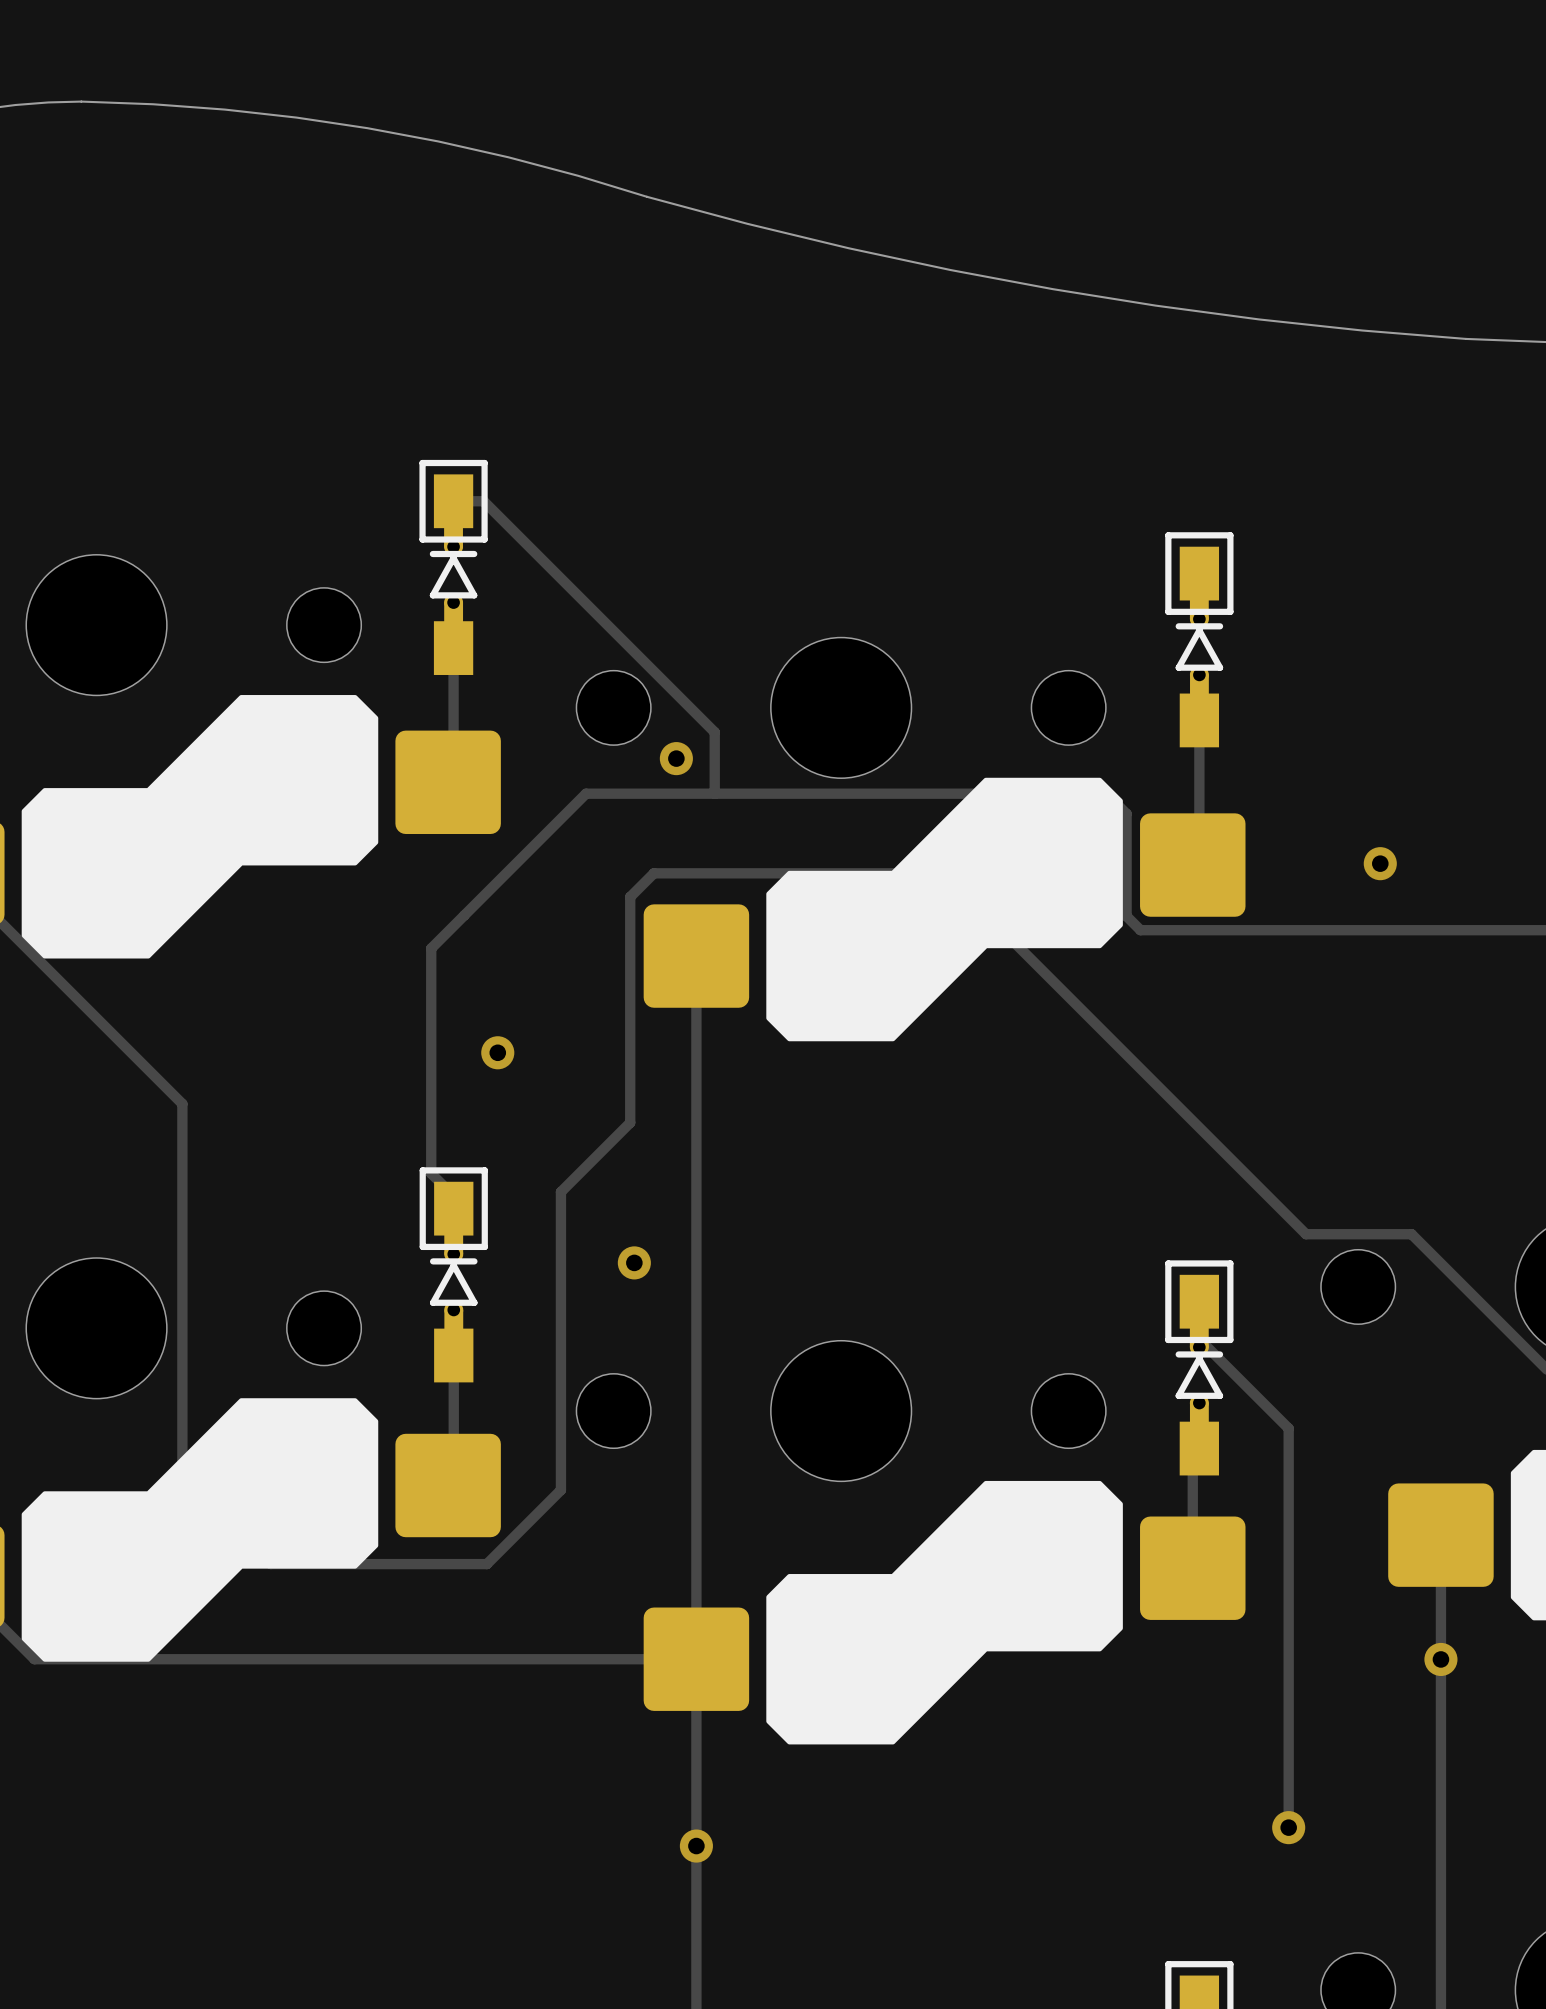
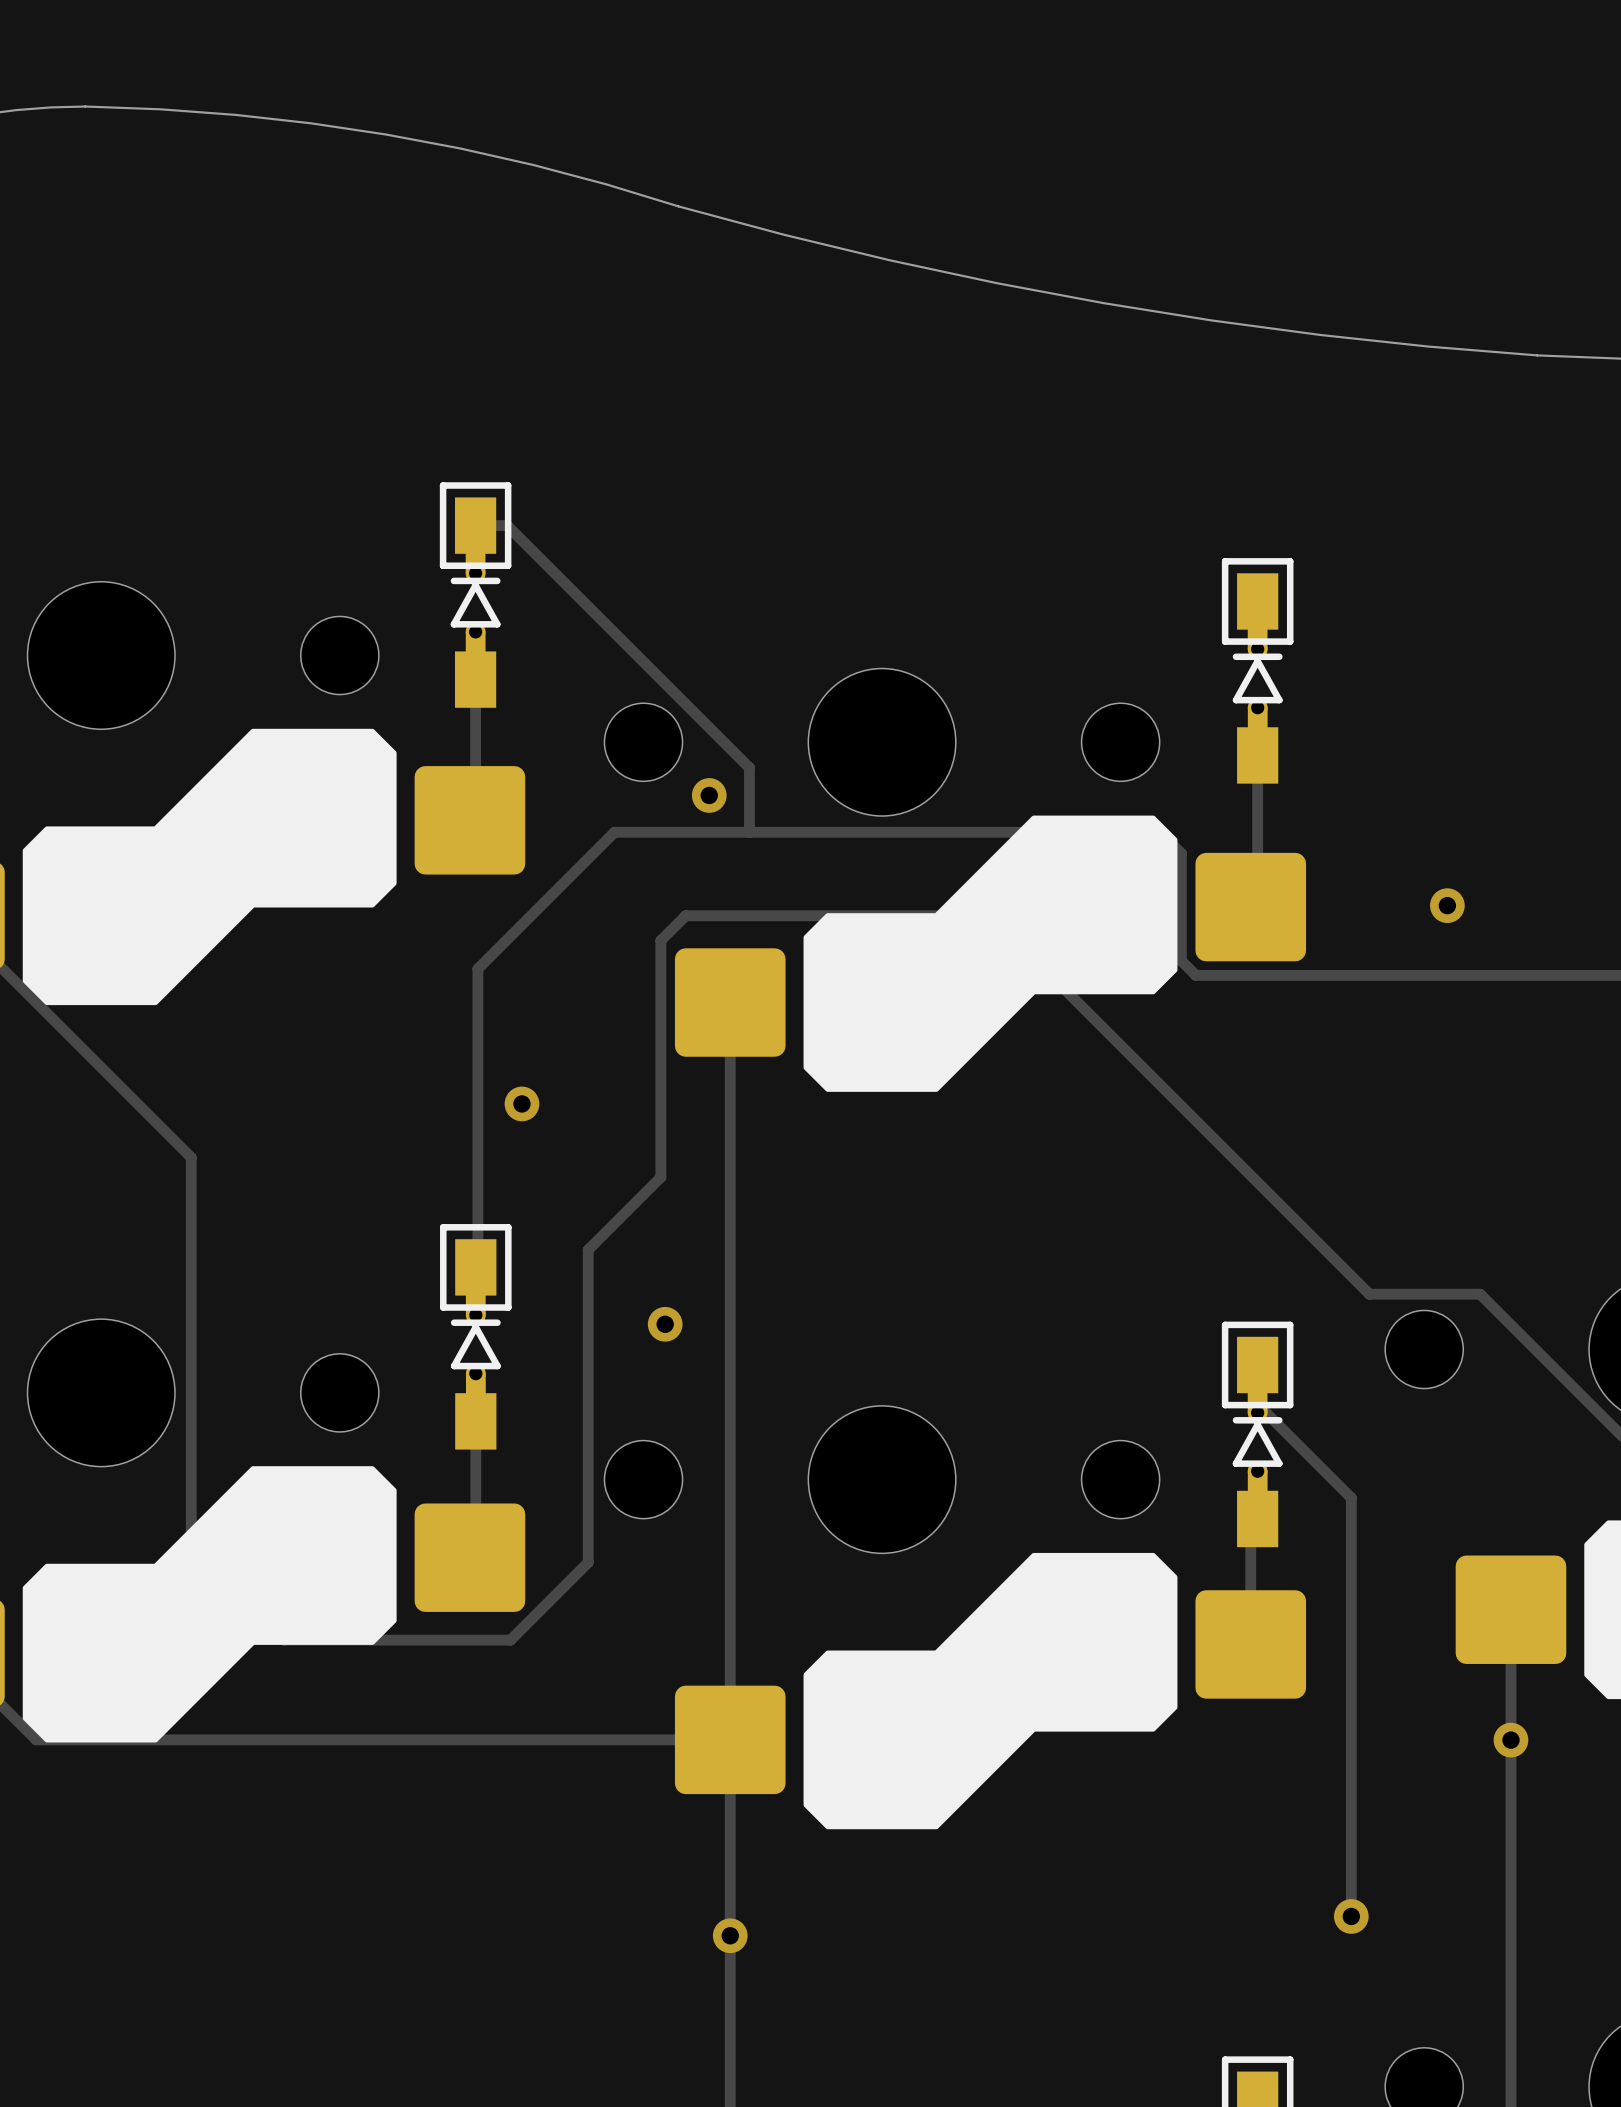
track: (455, 924) (431, 948) (431, 1173) (455, 1198) -> (477, 968) (477, 1256)

